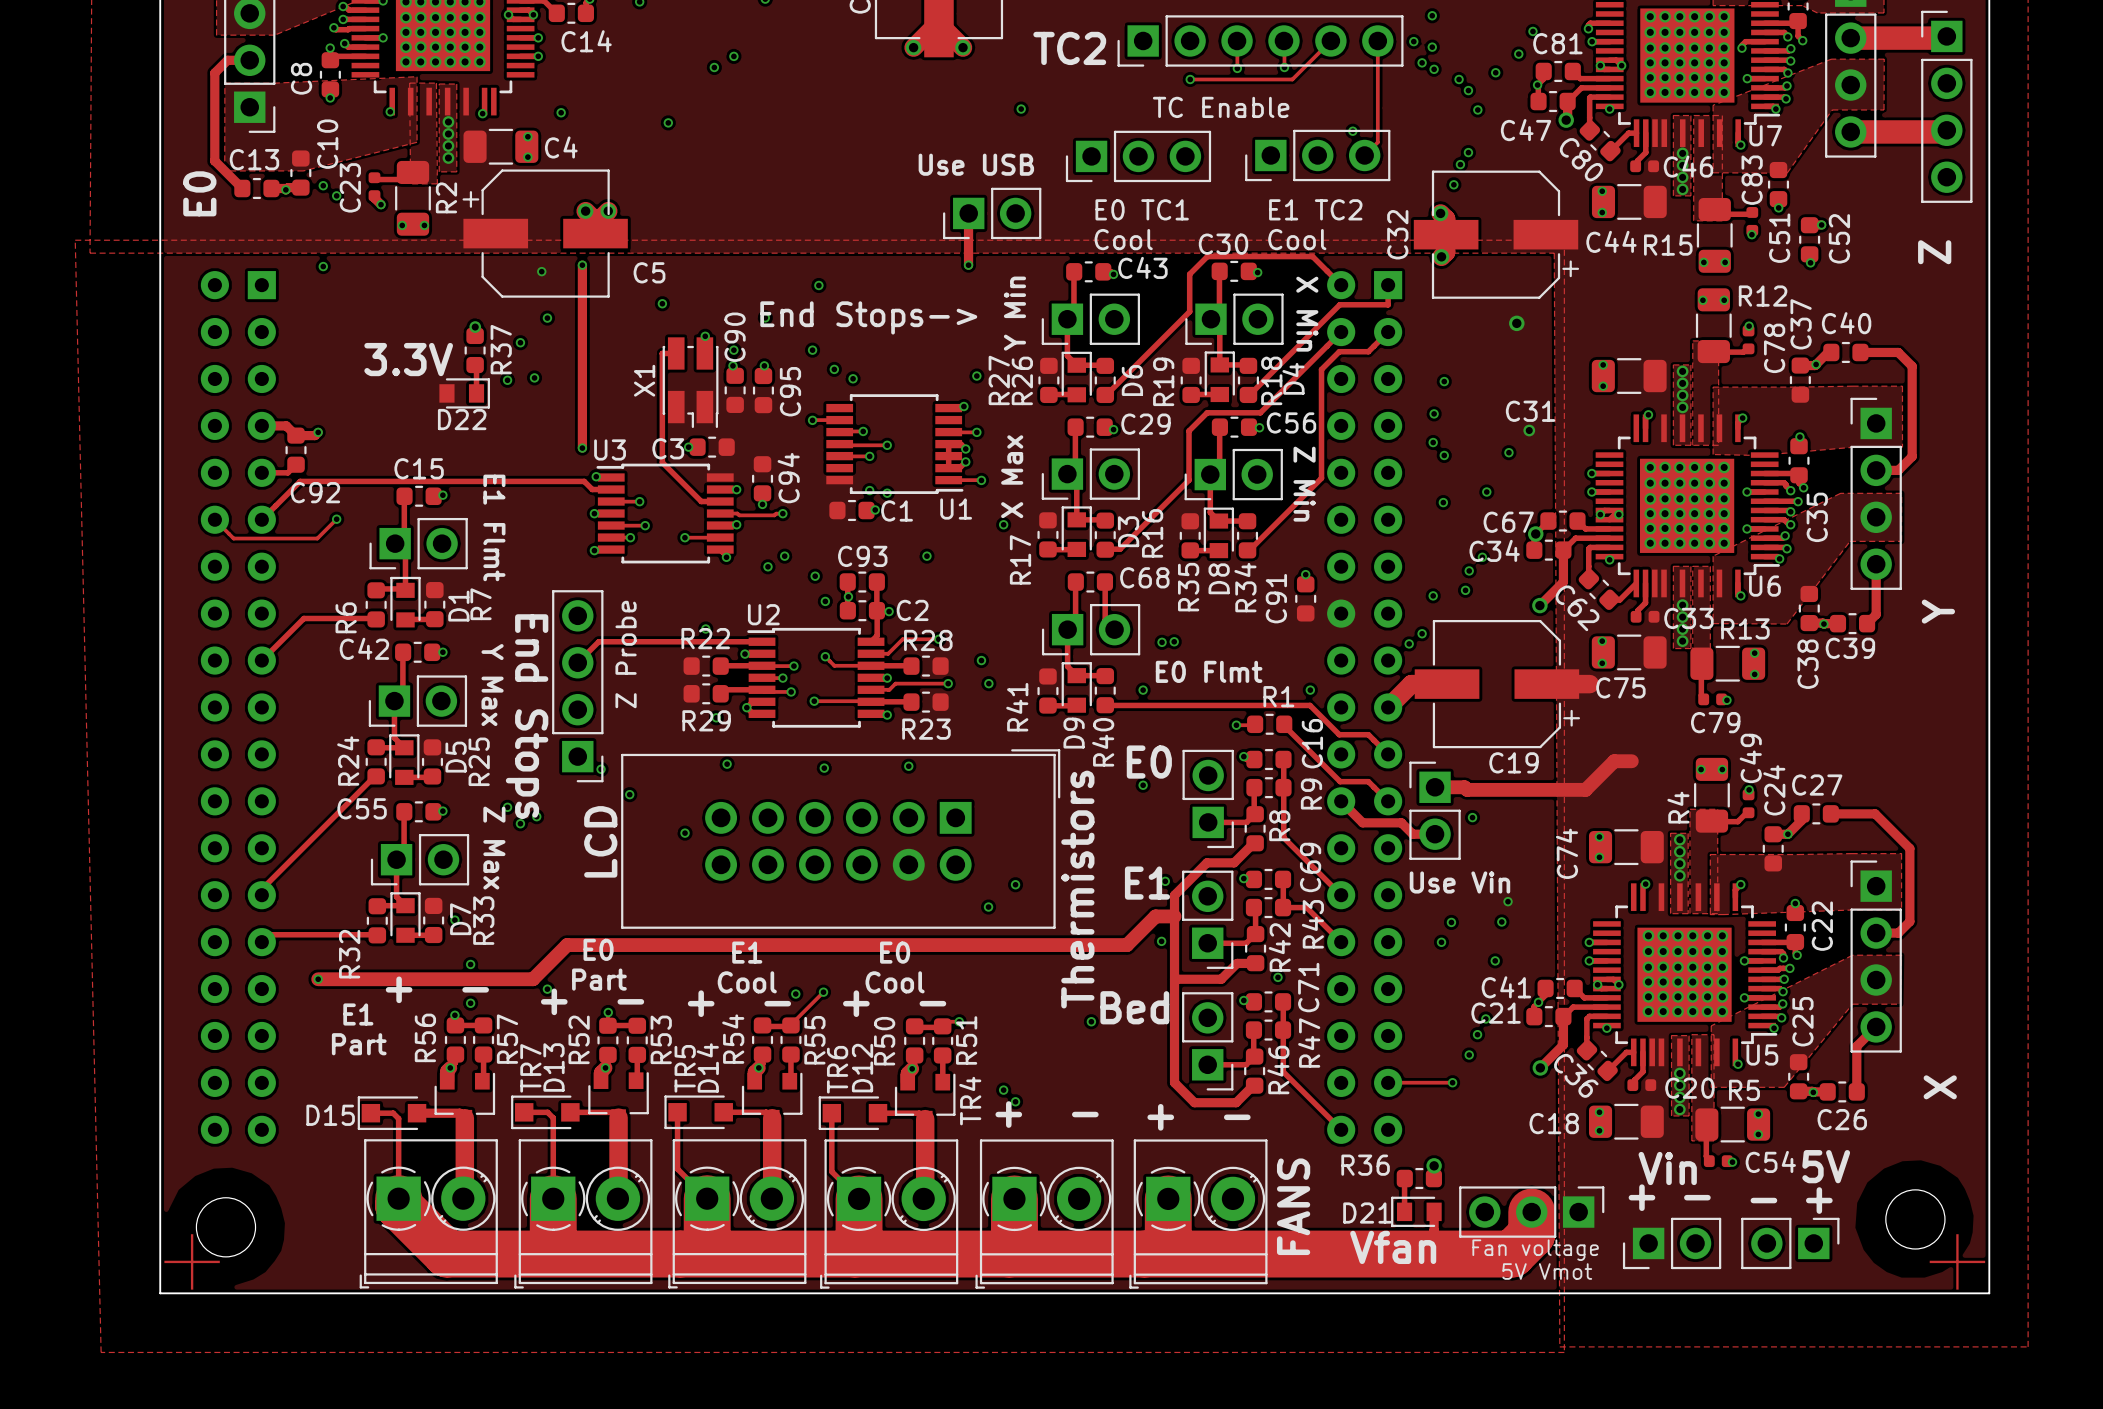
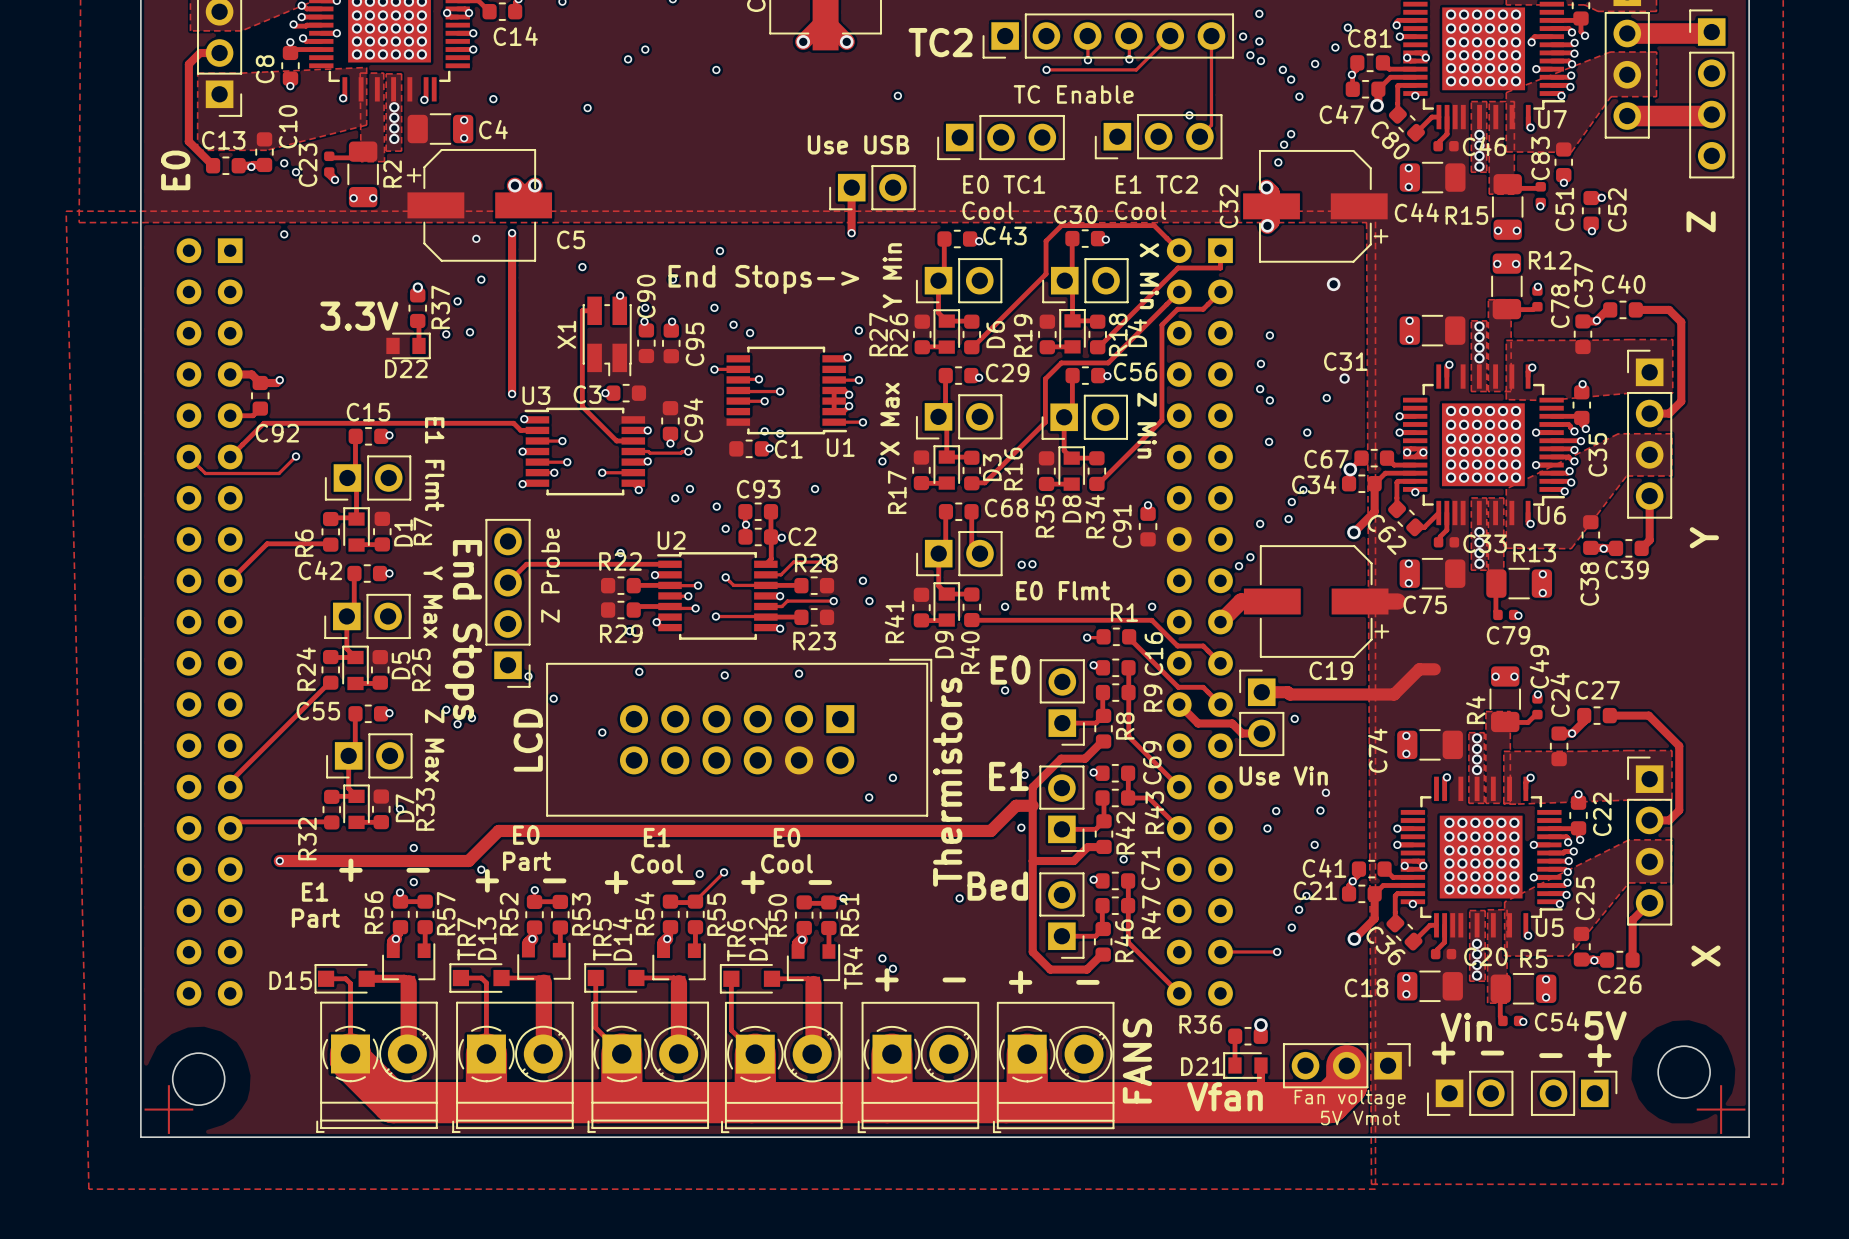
via: none -> (716, 69)

